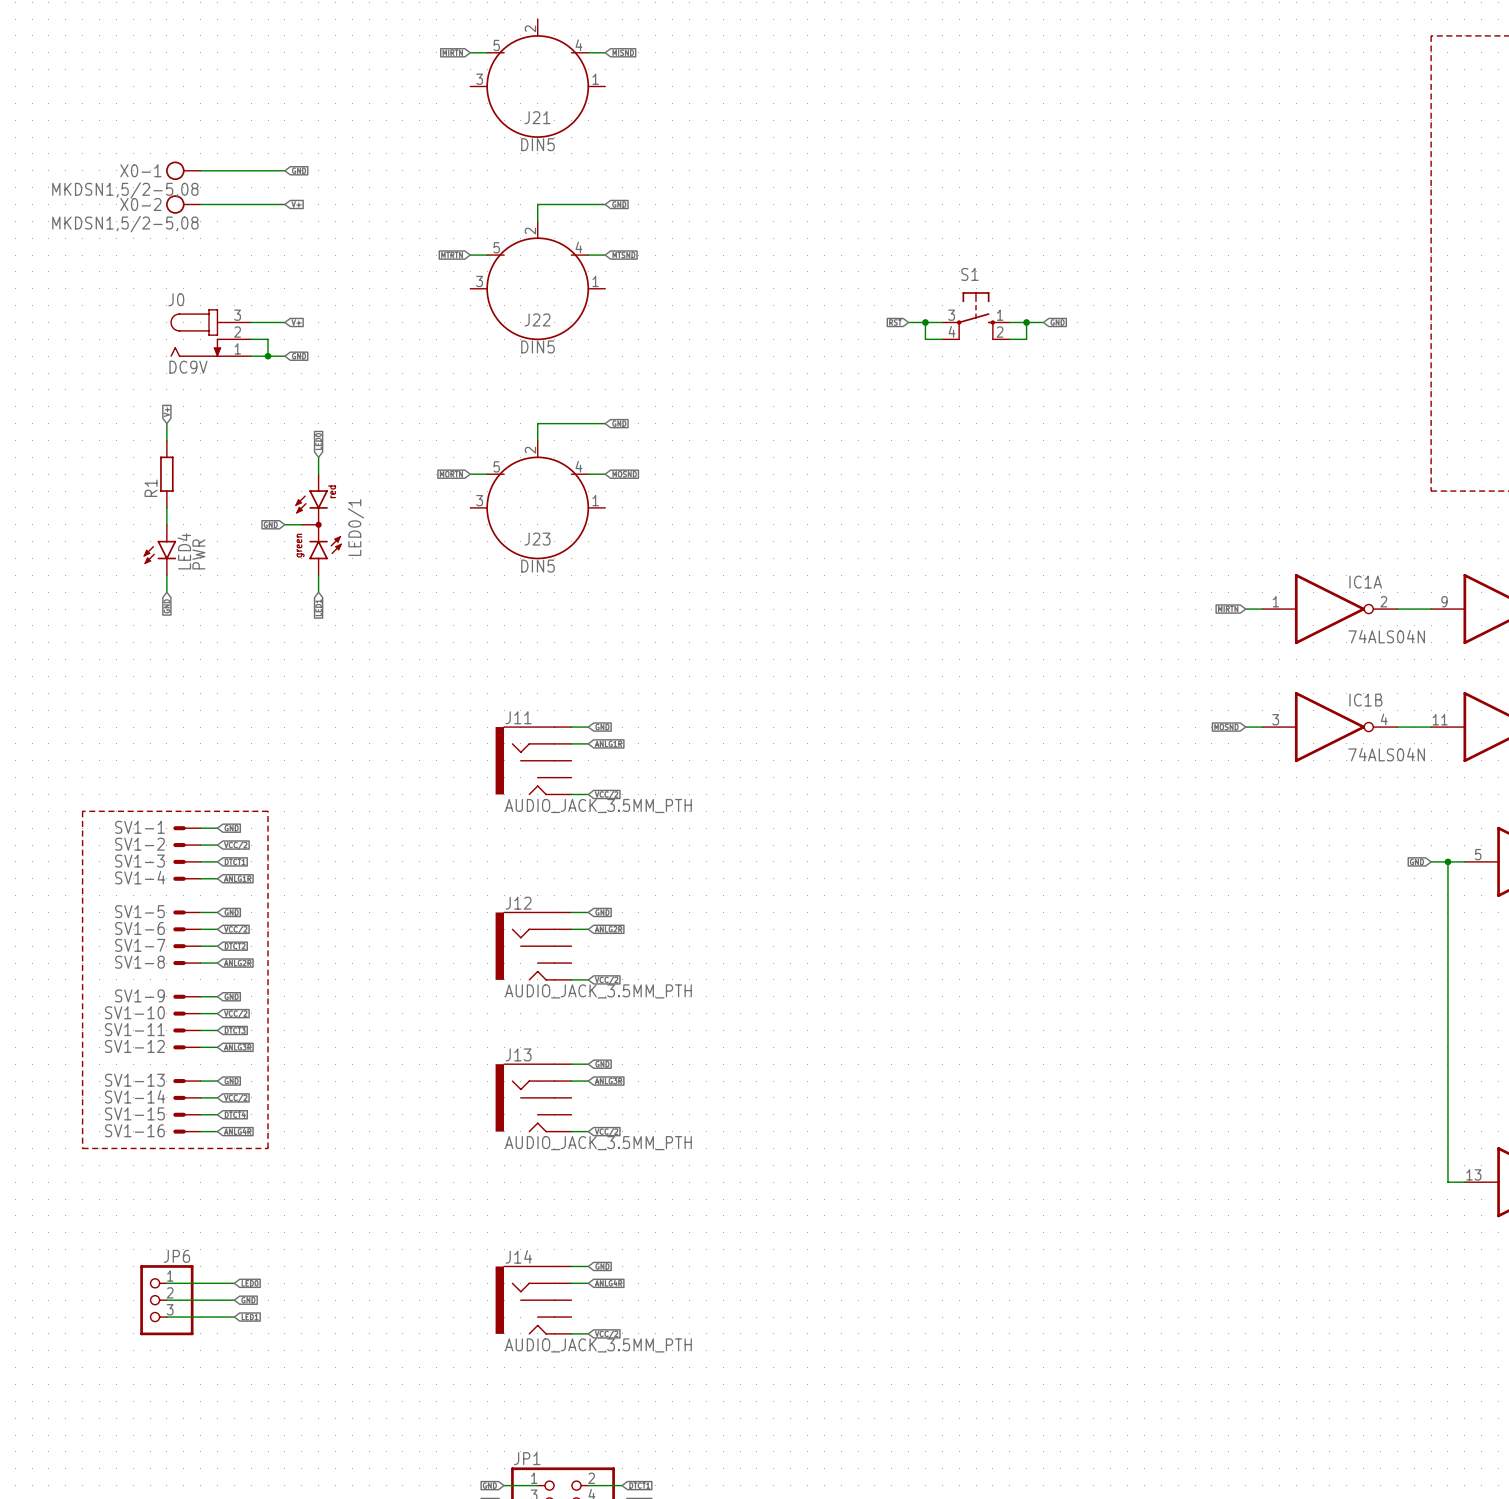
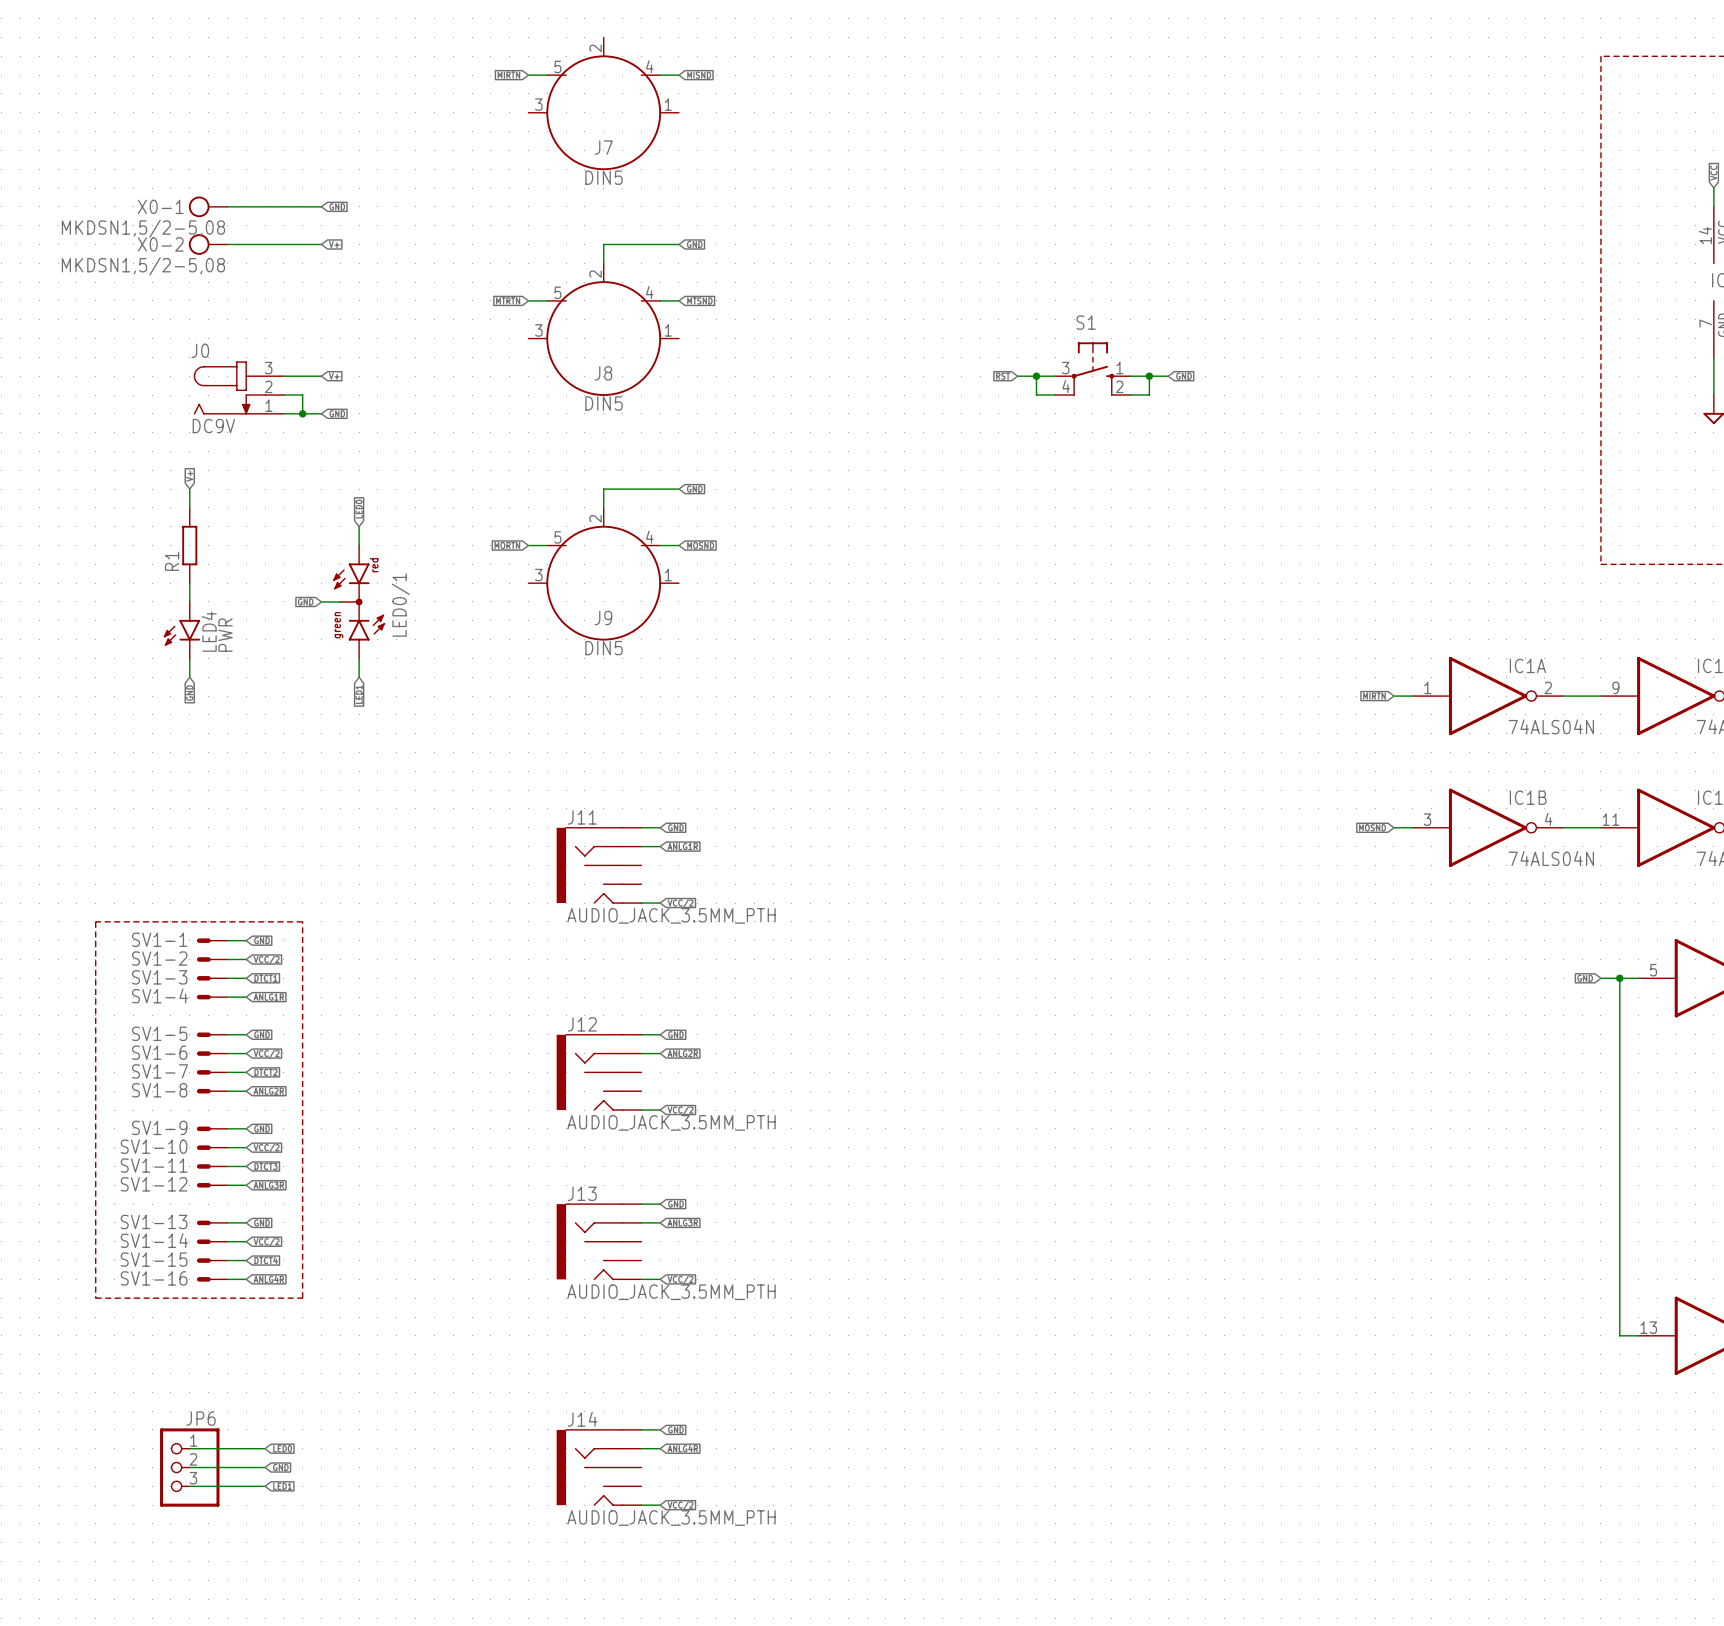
J21 name: J21 (537, 117) -> J7 (603, 147)
J22 name: J22 (537, 319) -> J8 (603, 373)
J23 name: J23 (537, 539) -> J9 (603, 617)

